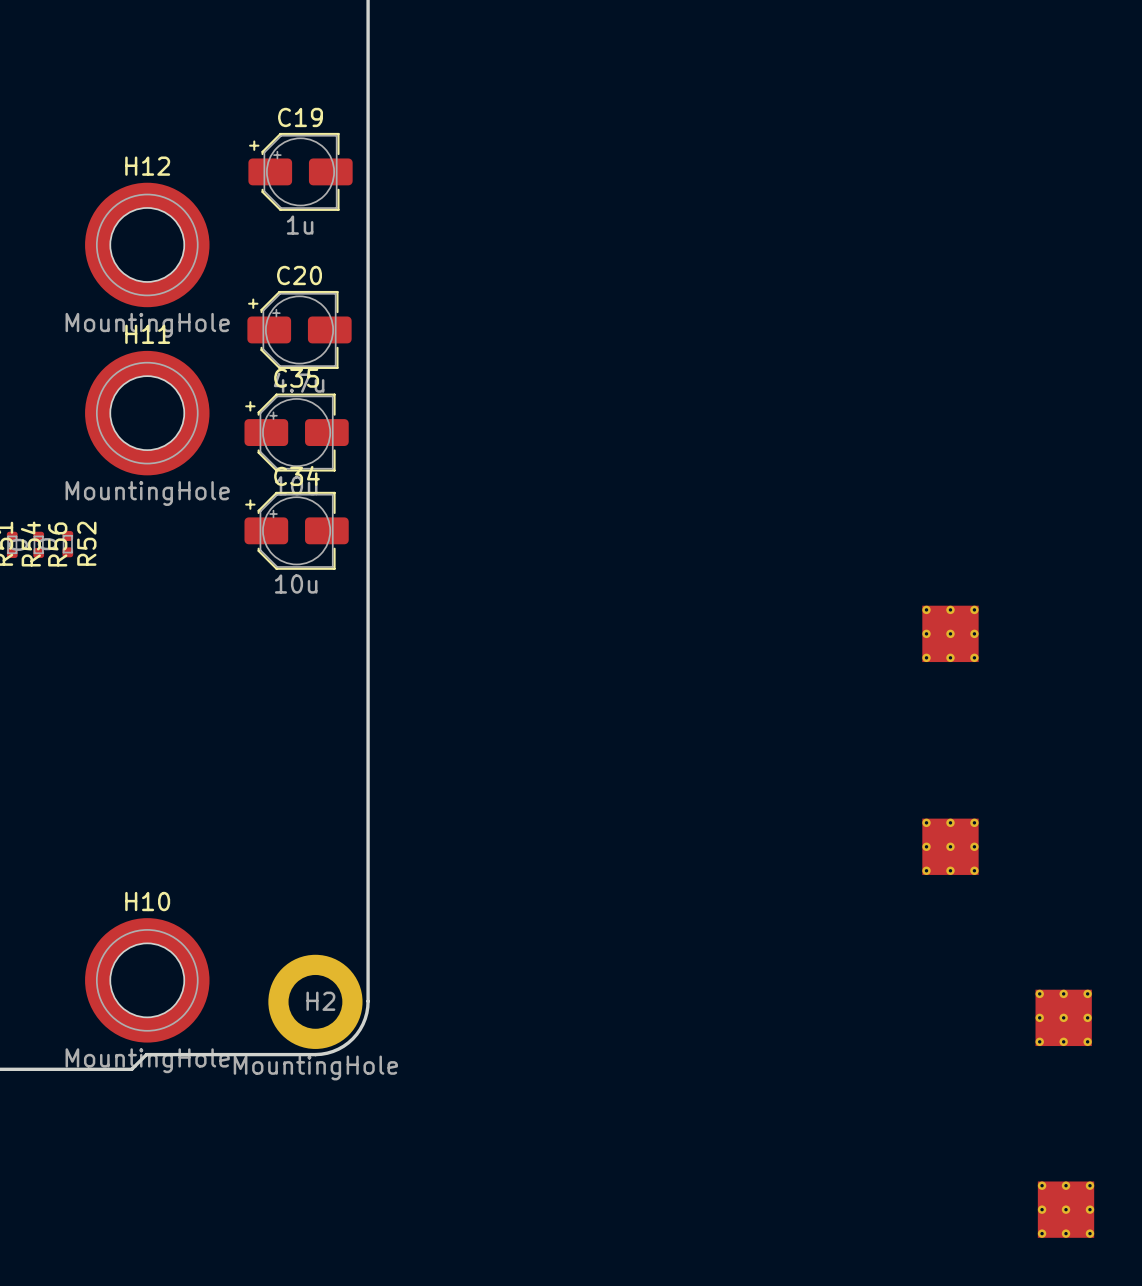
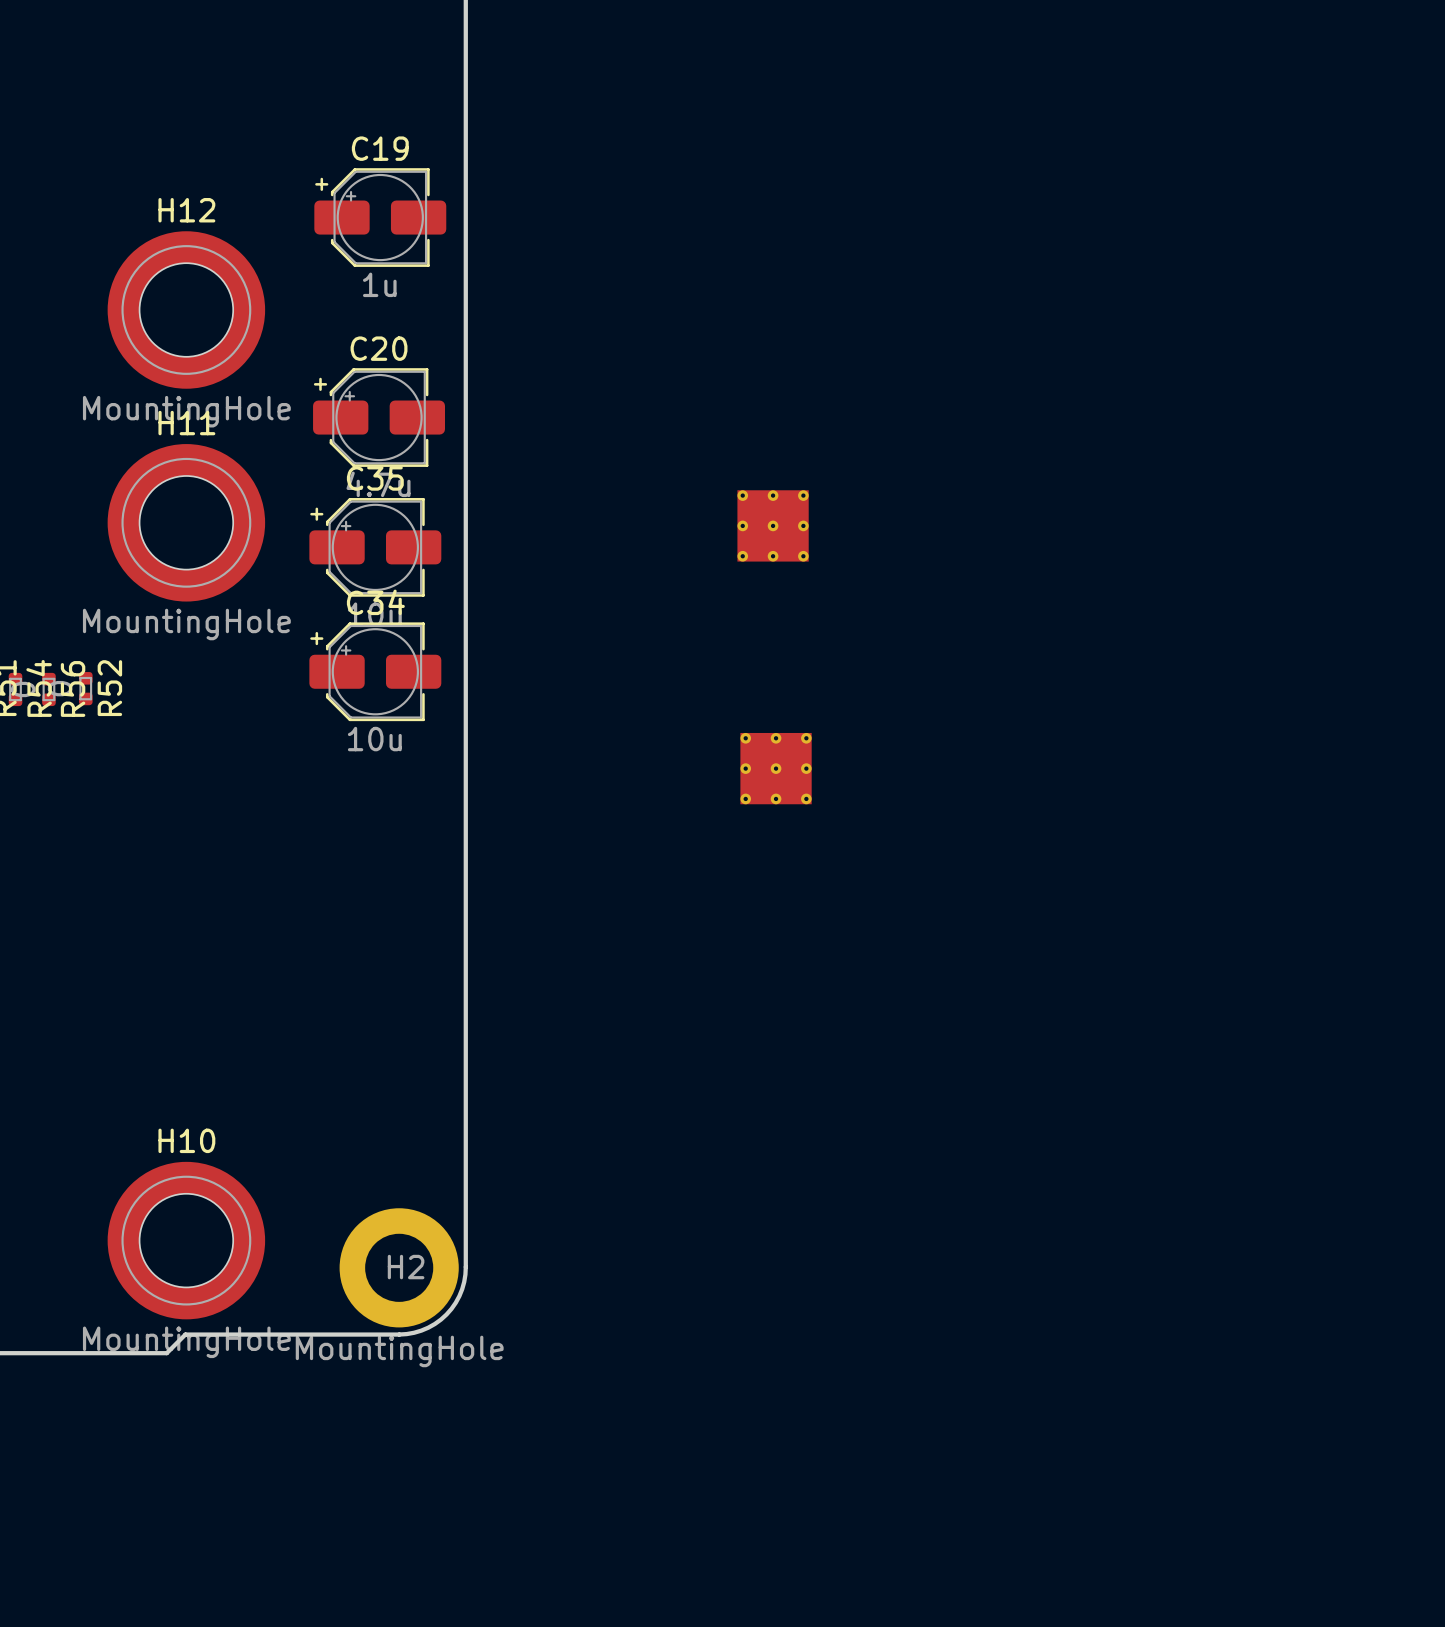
part: none -> (773, 525)
part: none -> (776, 768)
part: (950, 633) -> none
part: (950, 846) -> none
part: (1063, 1017) -> none
part: (1066, 1209) -> none

